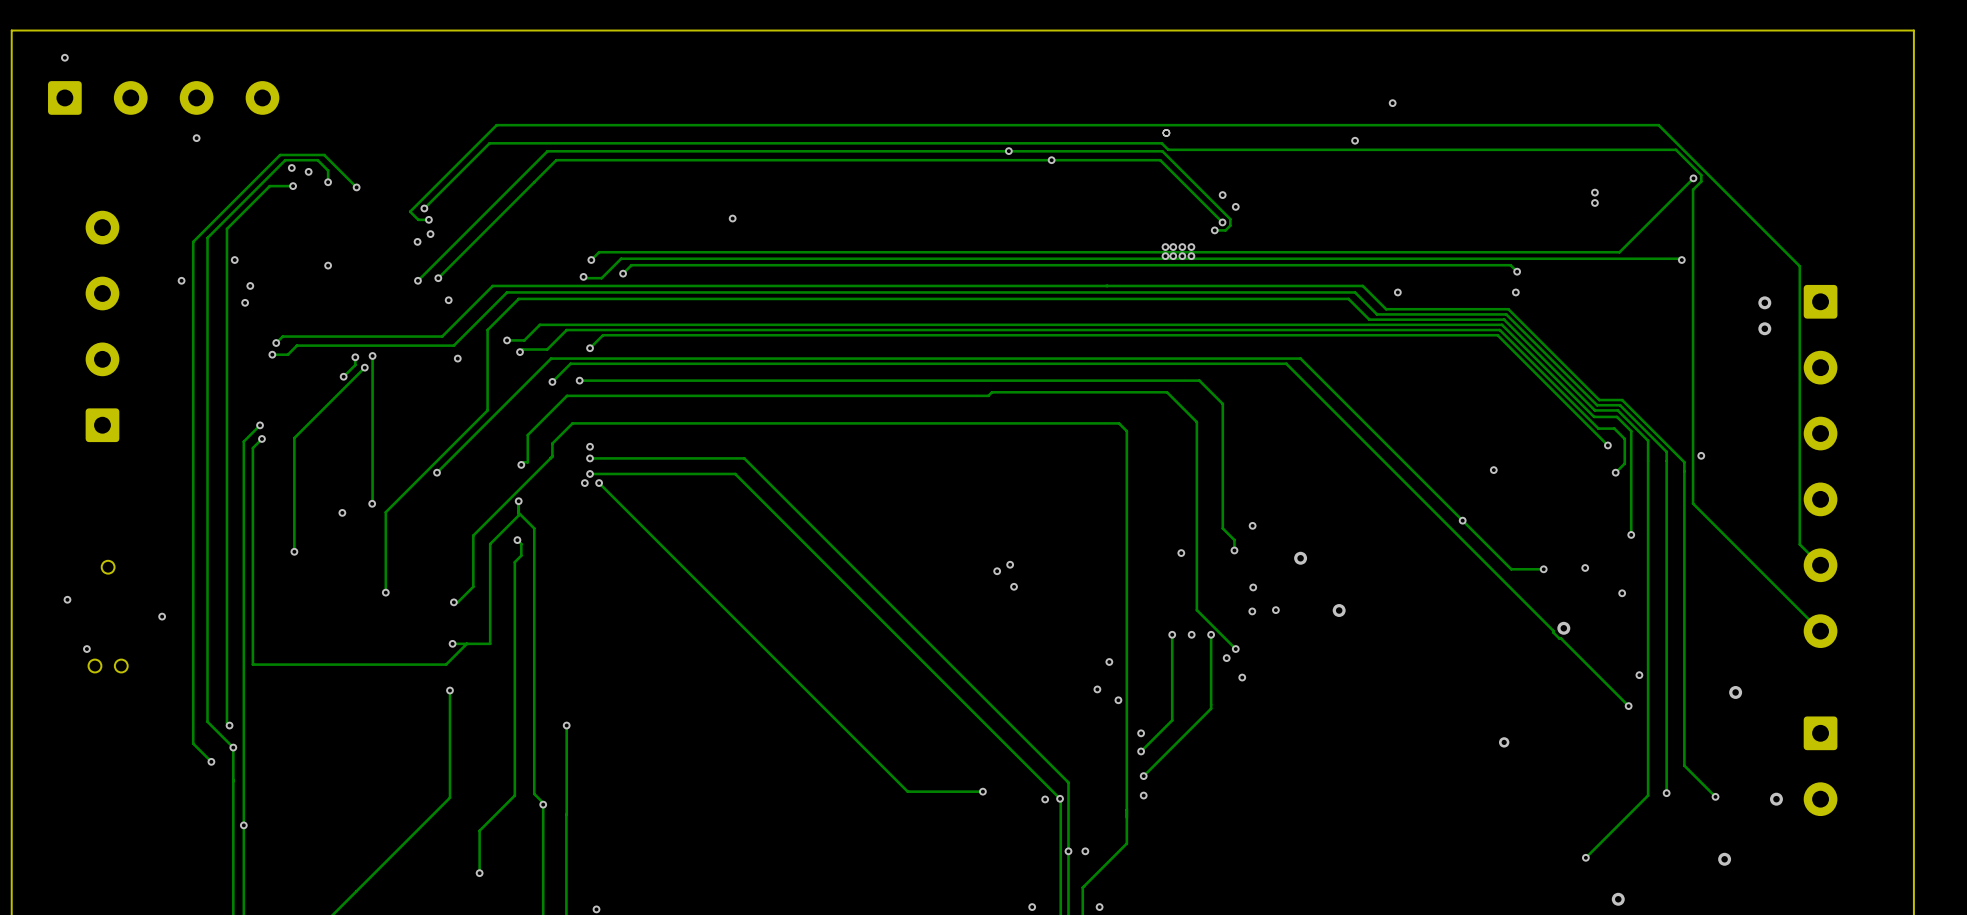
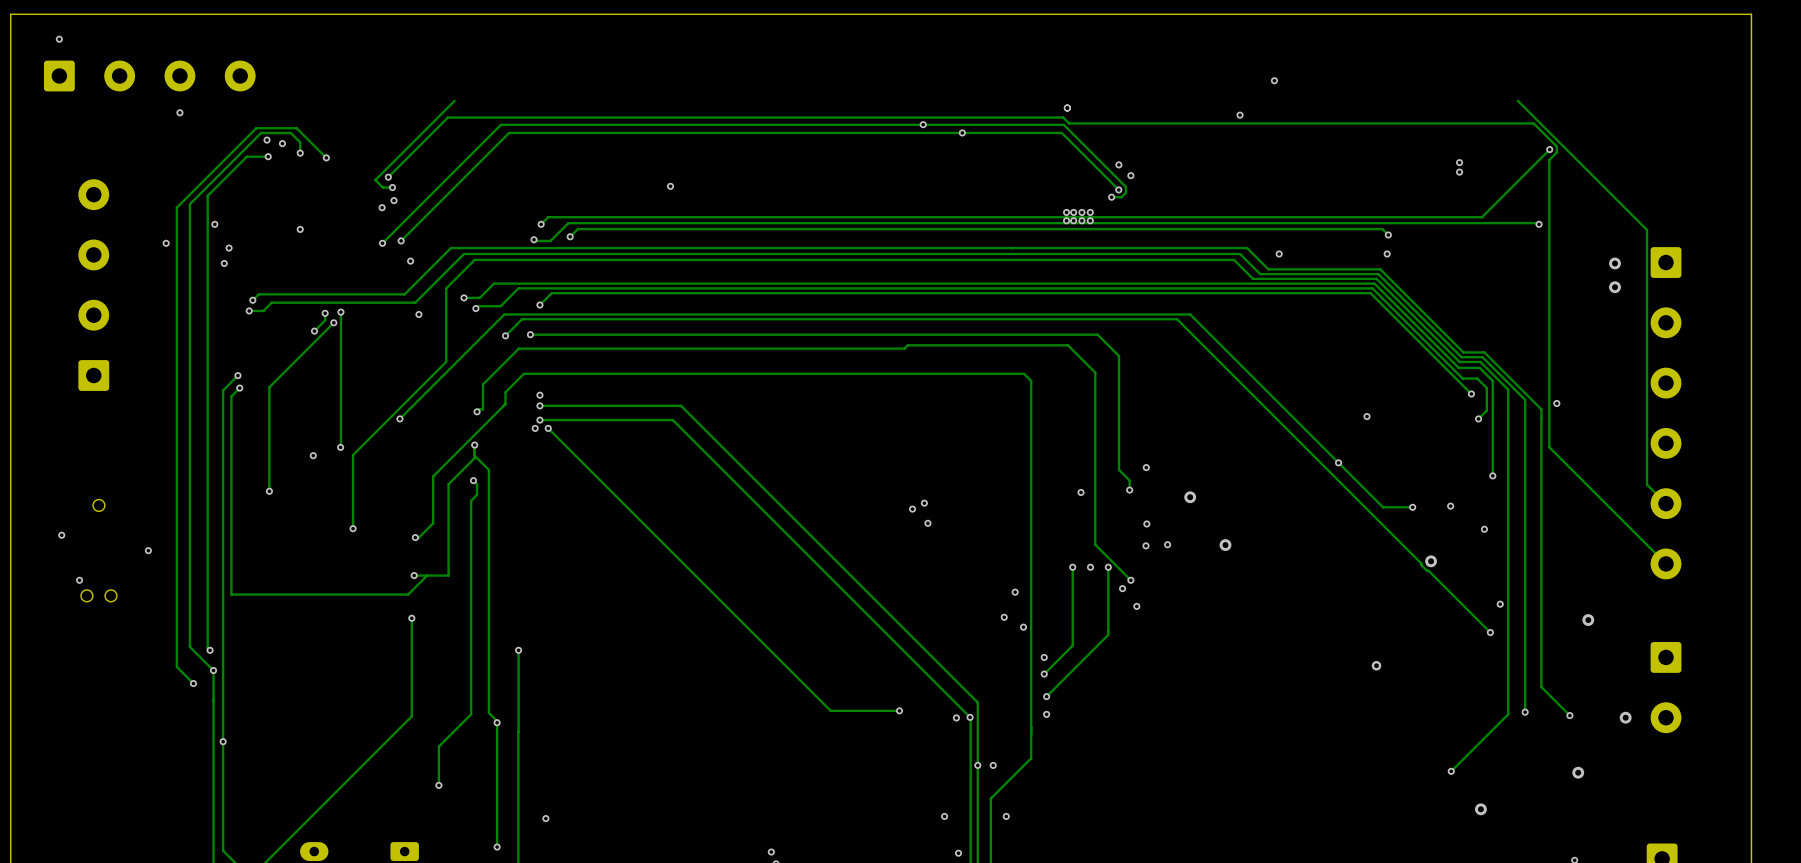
track: (1658, 125) (496, 125) -> none

